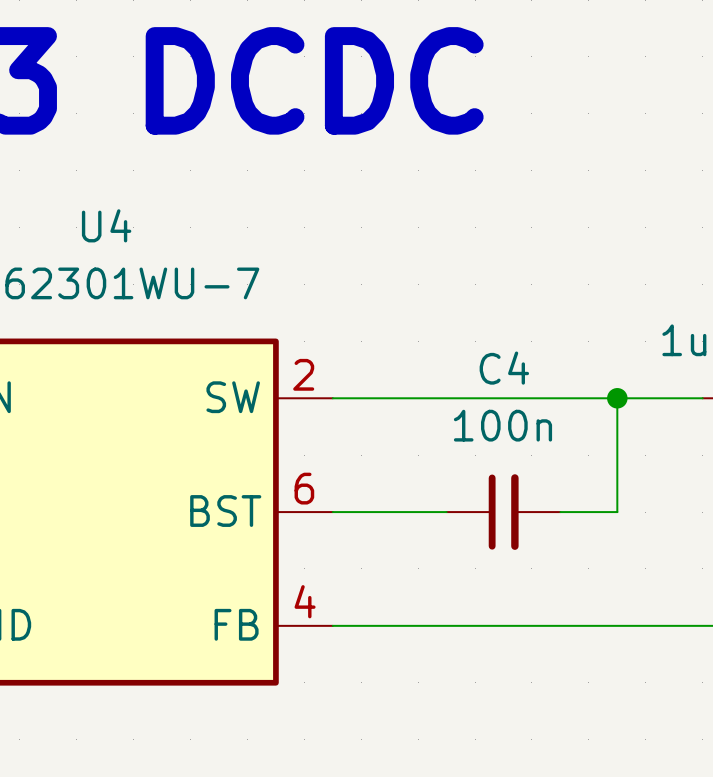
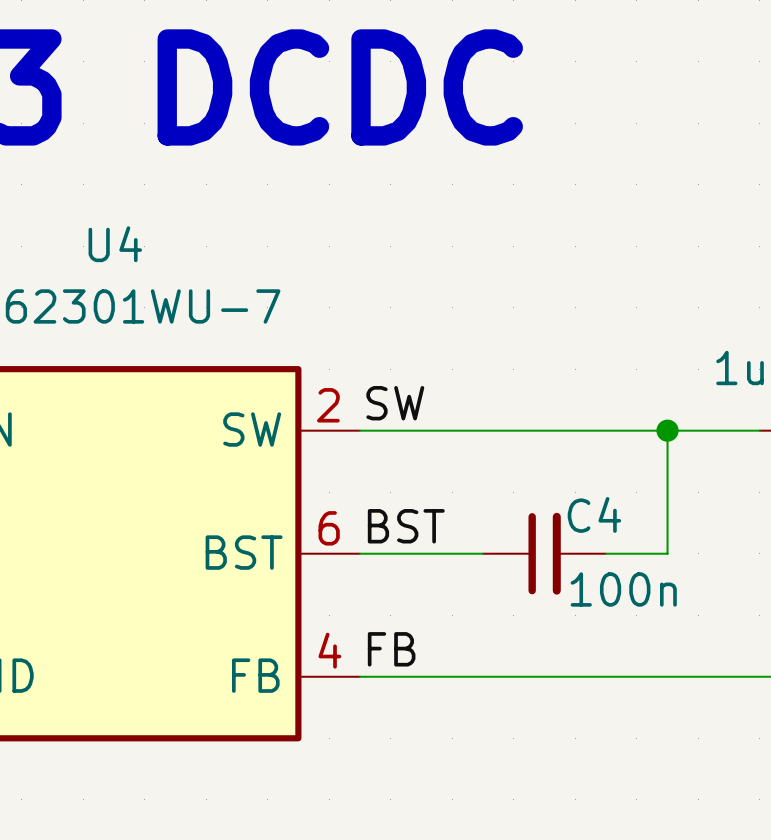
C4 name position: C4 (504, 368) -> C4 (594, 514)
label: none -> SW (395, 403)
C4 text position: 100n (502, 425) -> 100n (623, 589)
label: none -> BST (406, 526)
label: none -> FB (391, 649)

